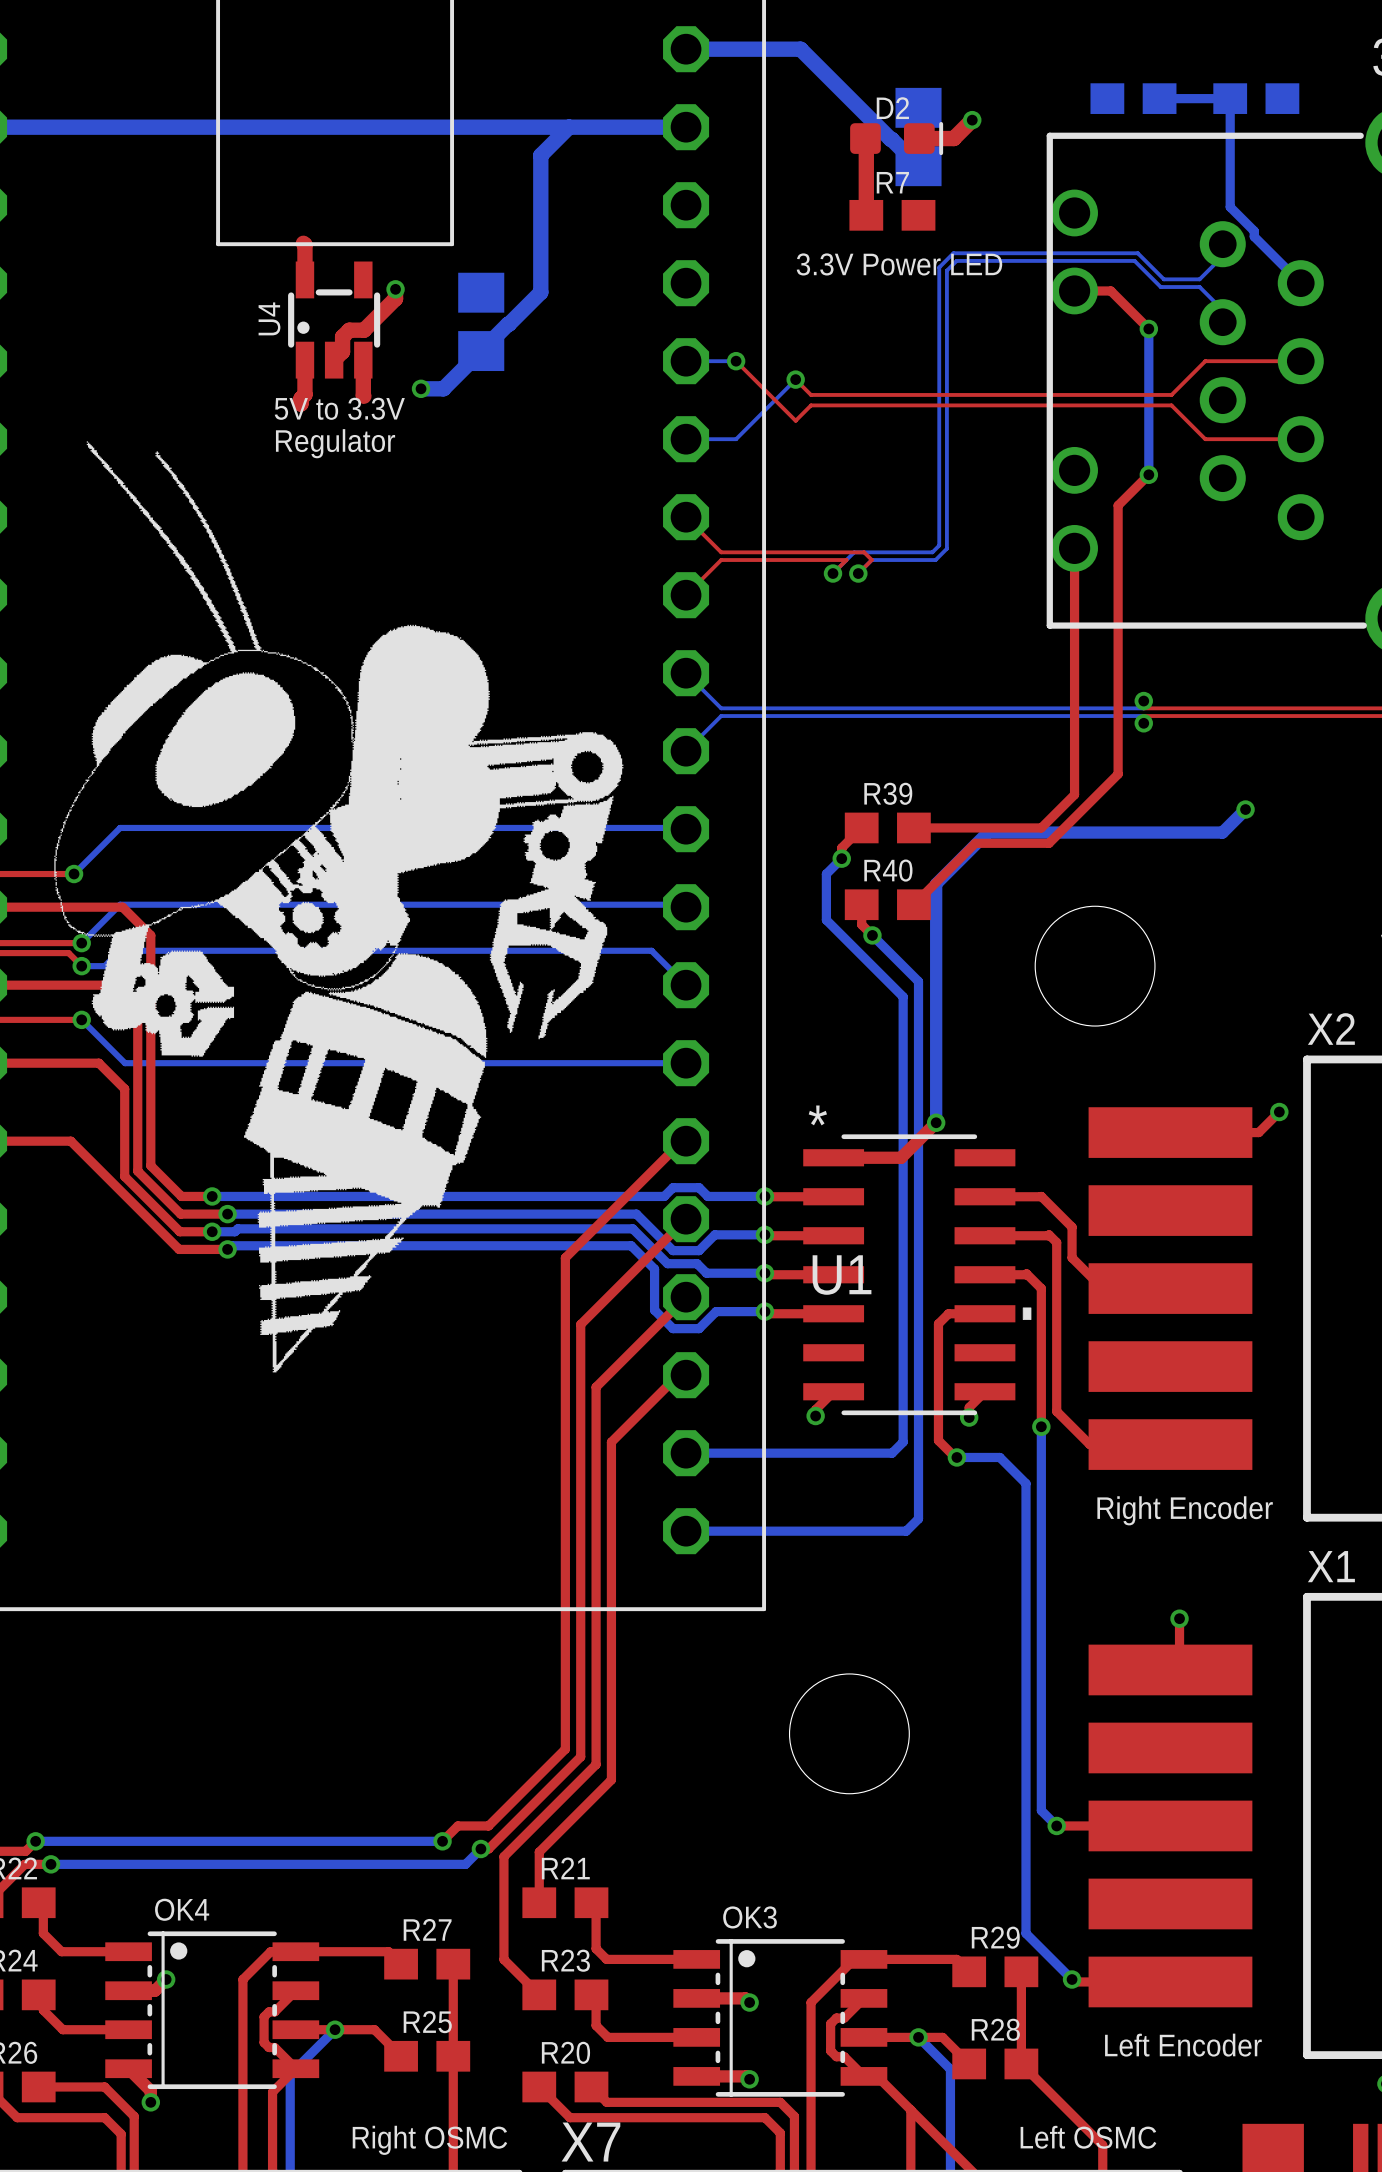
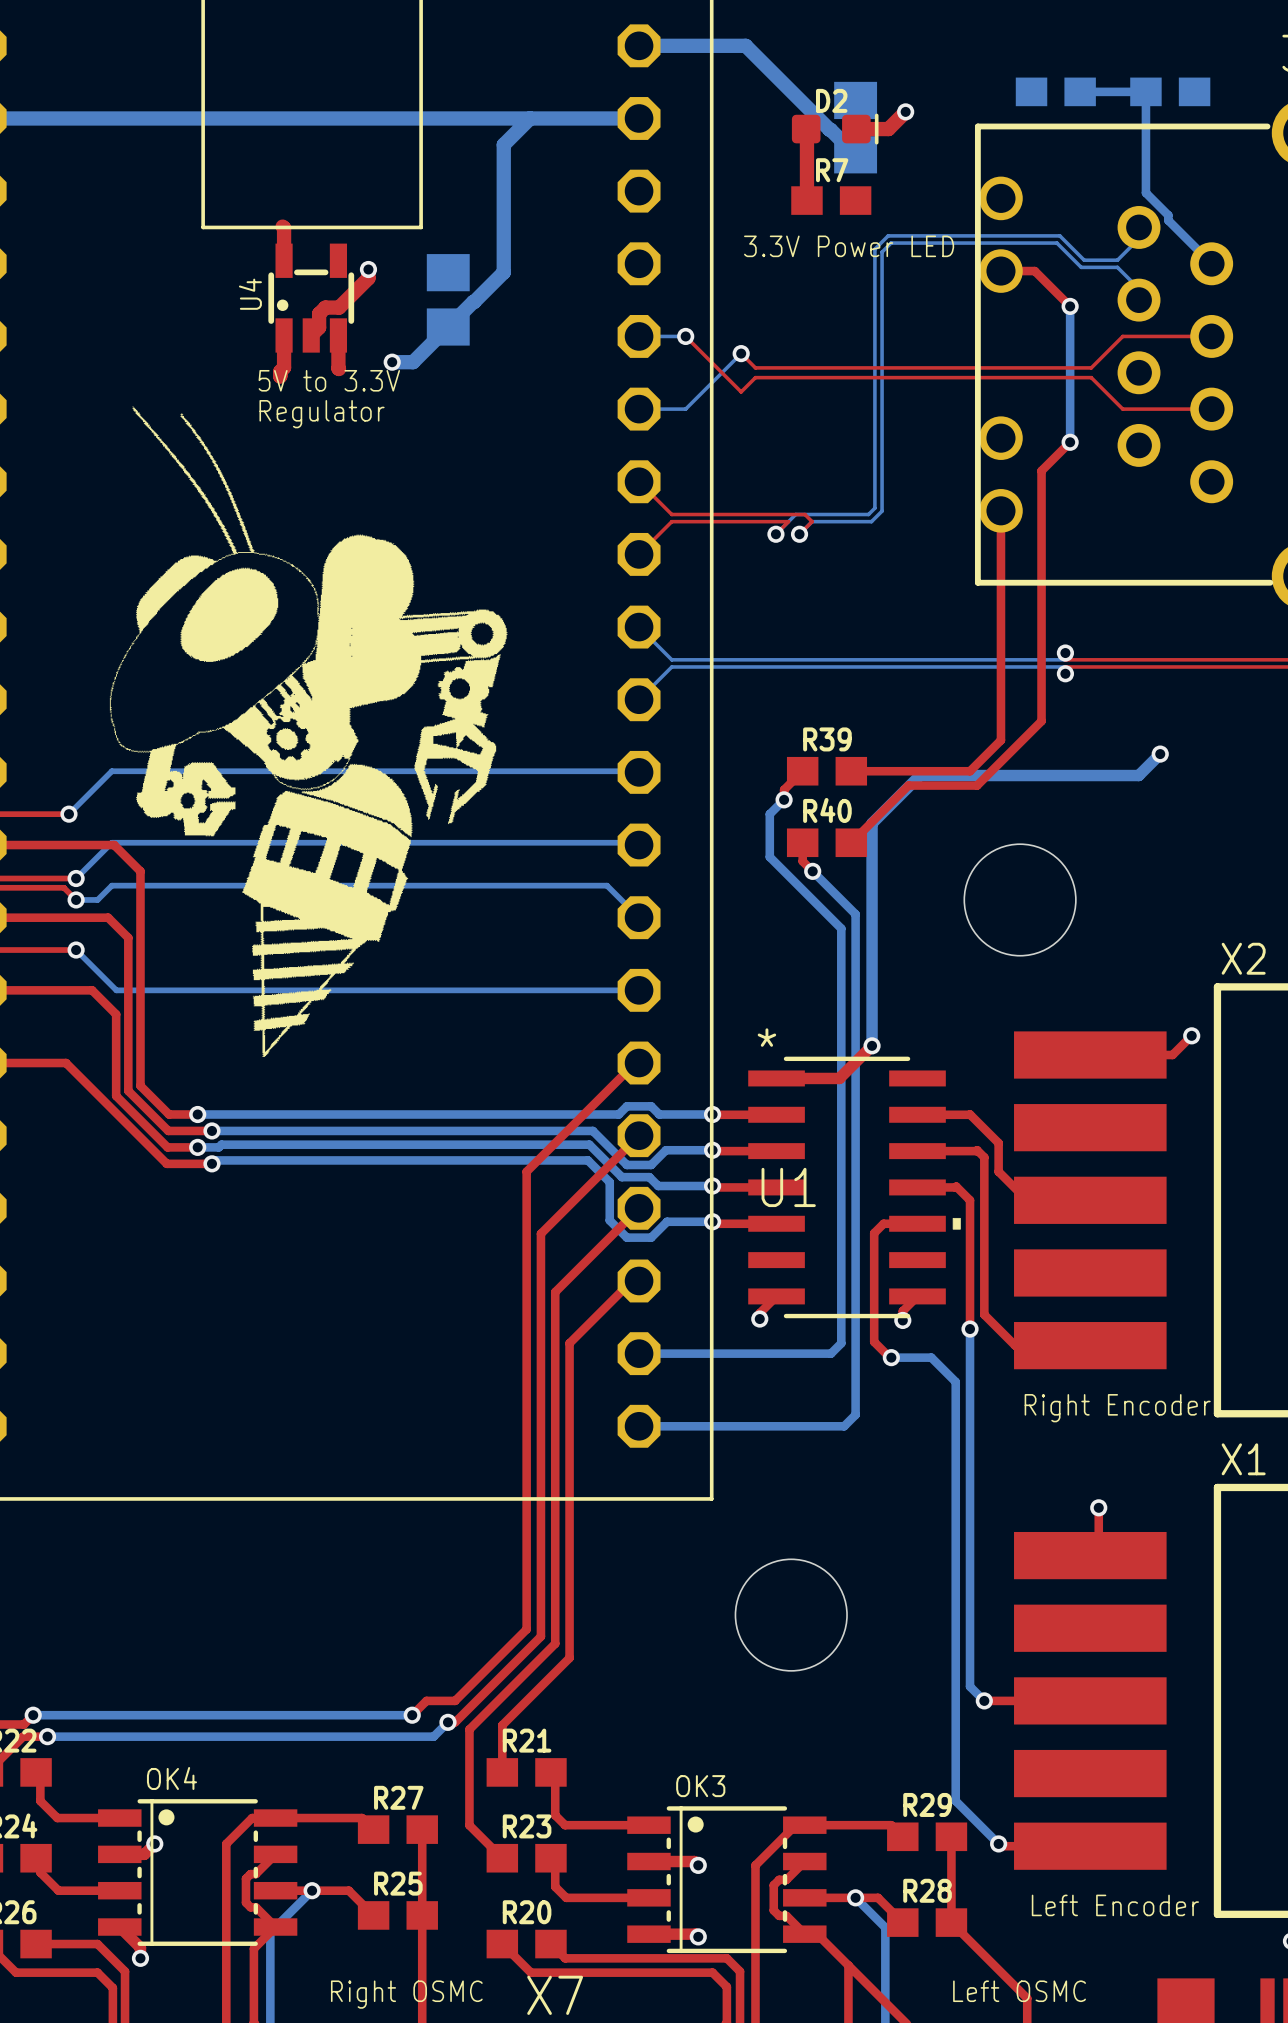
drawing: none -> [109, 406, 508, 1057]
drawing: [54, 441, 624, 1373] -> none

